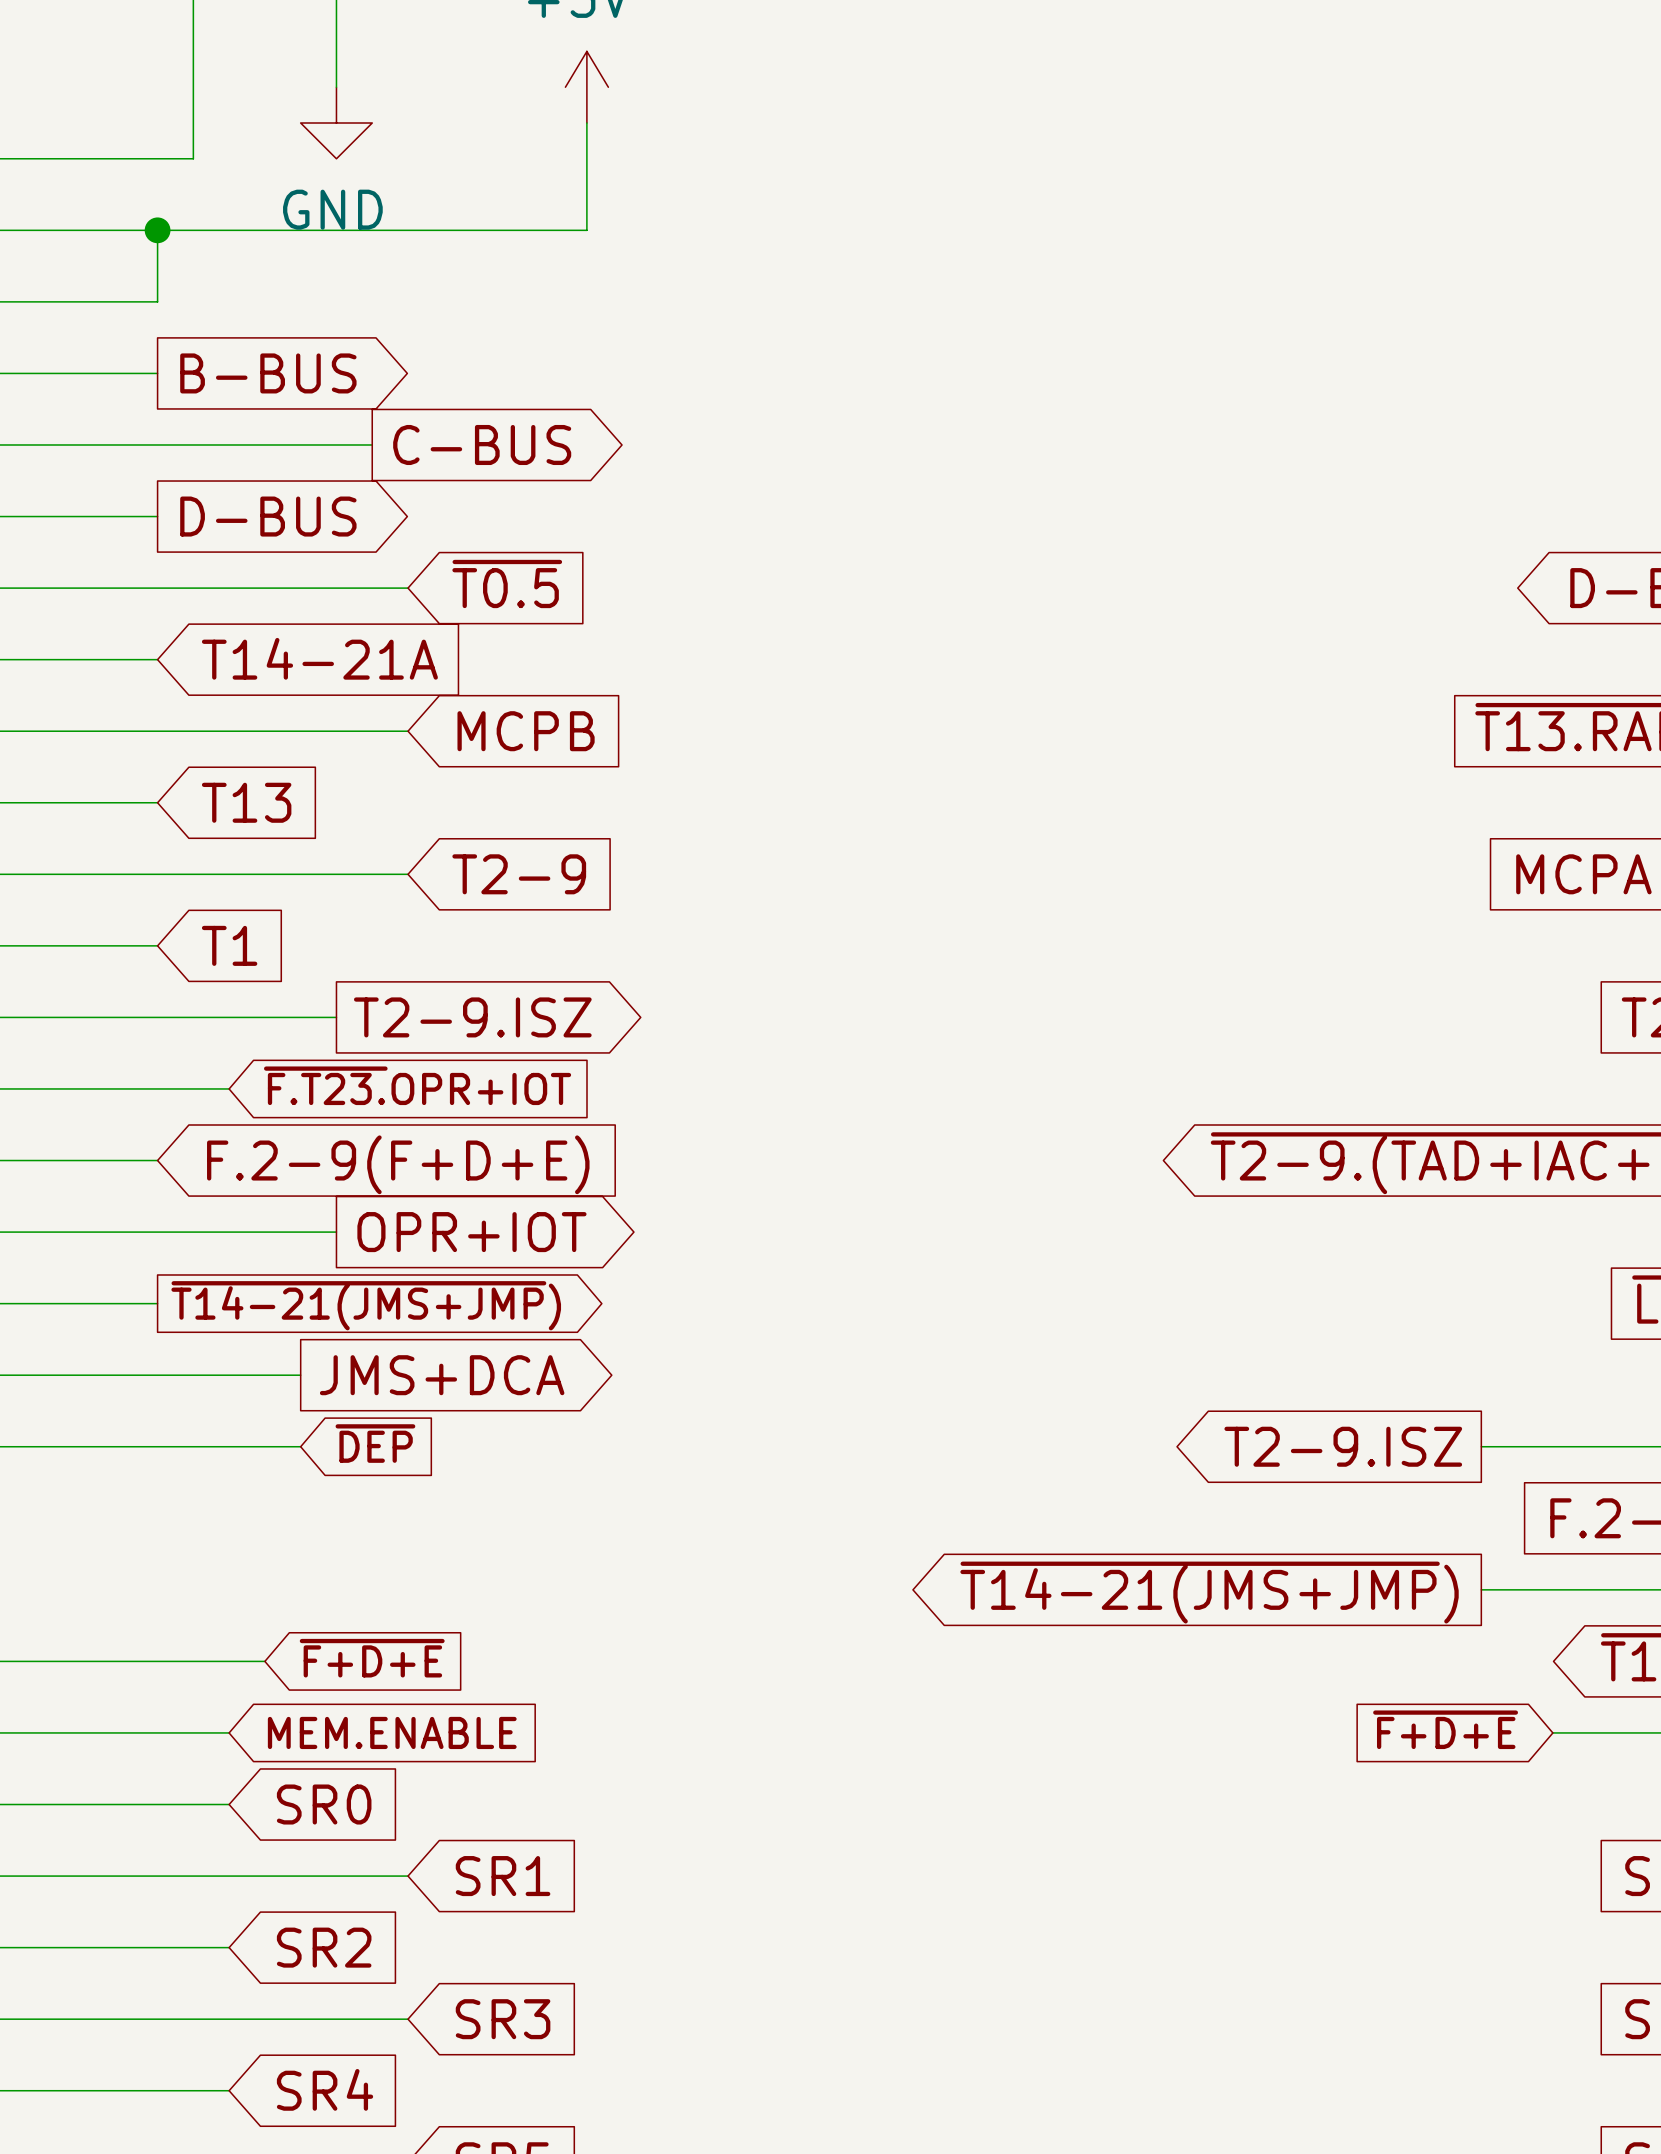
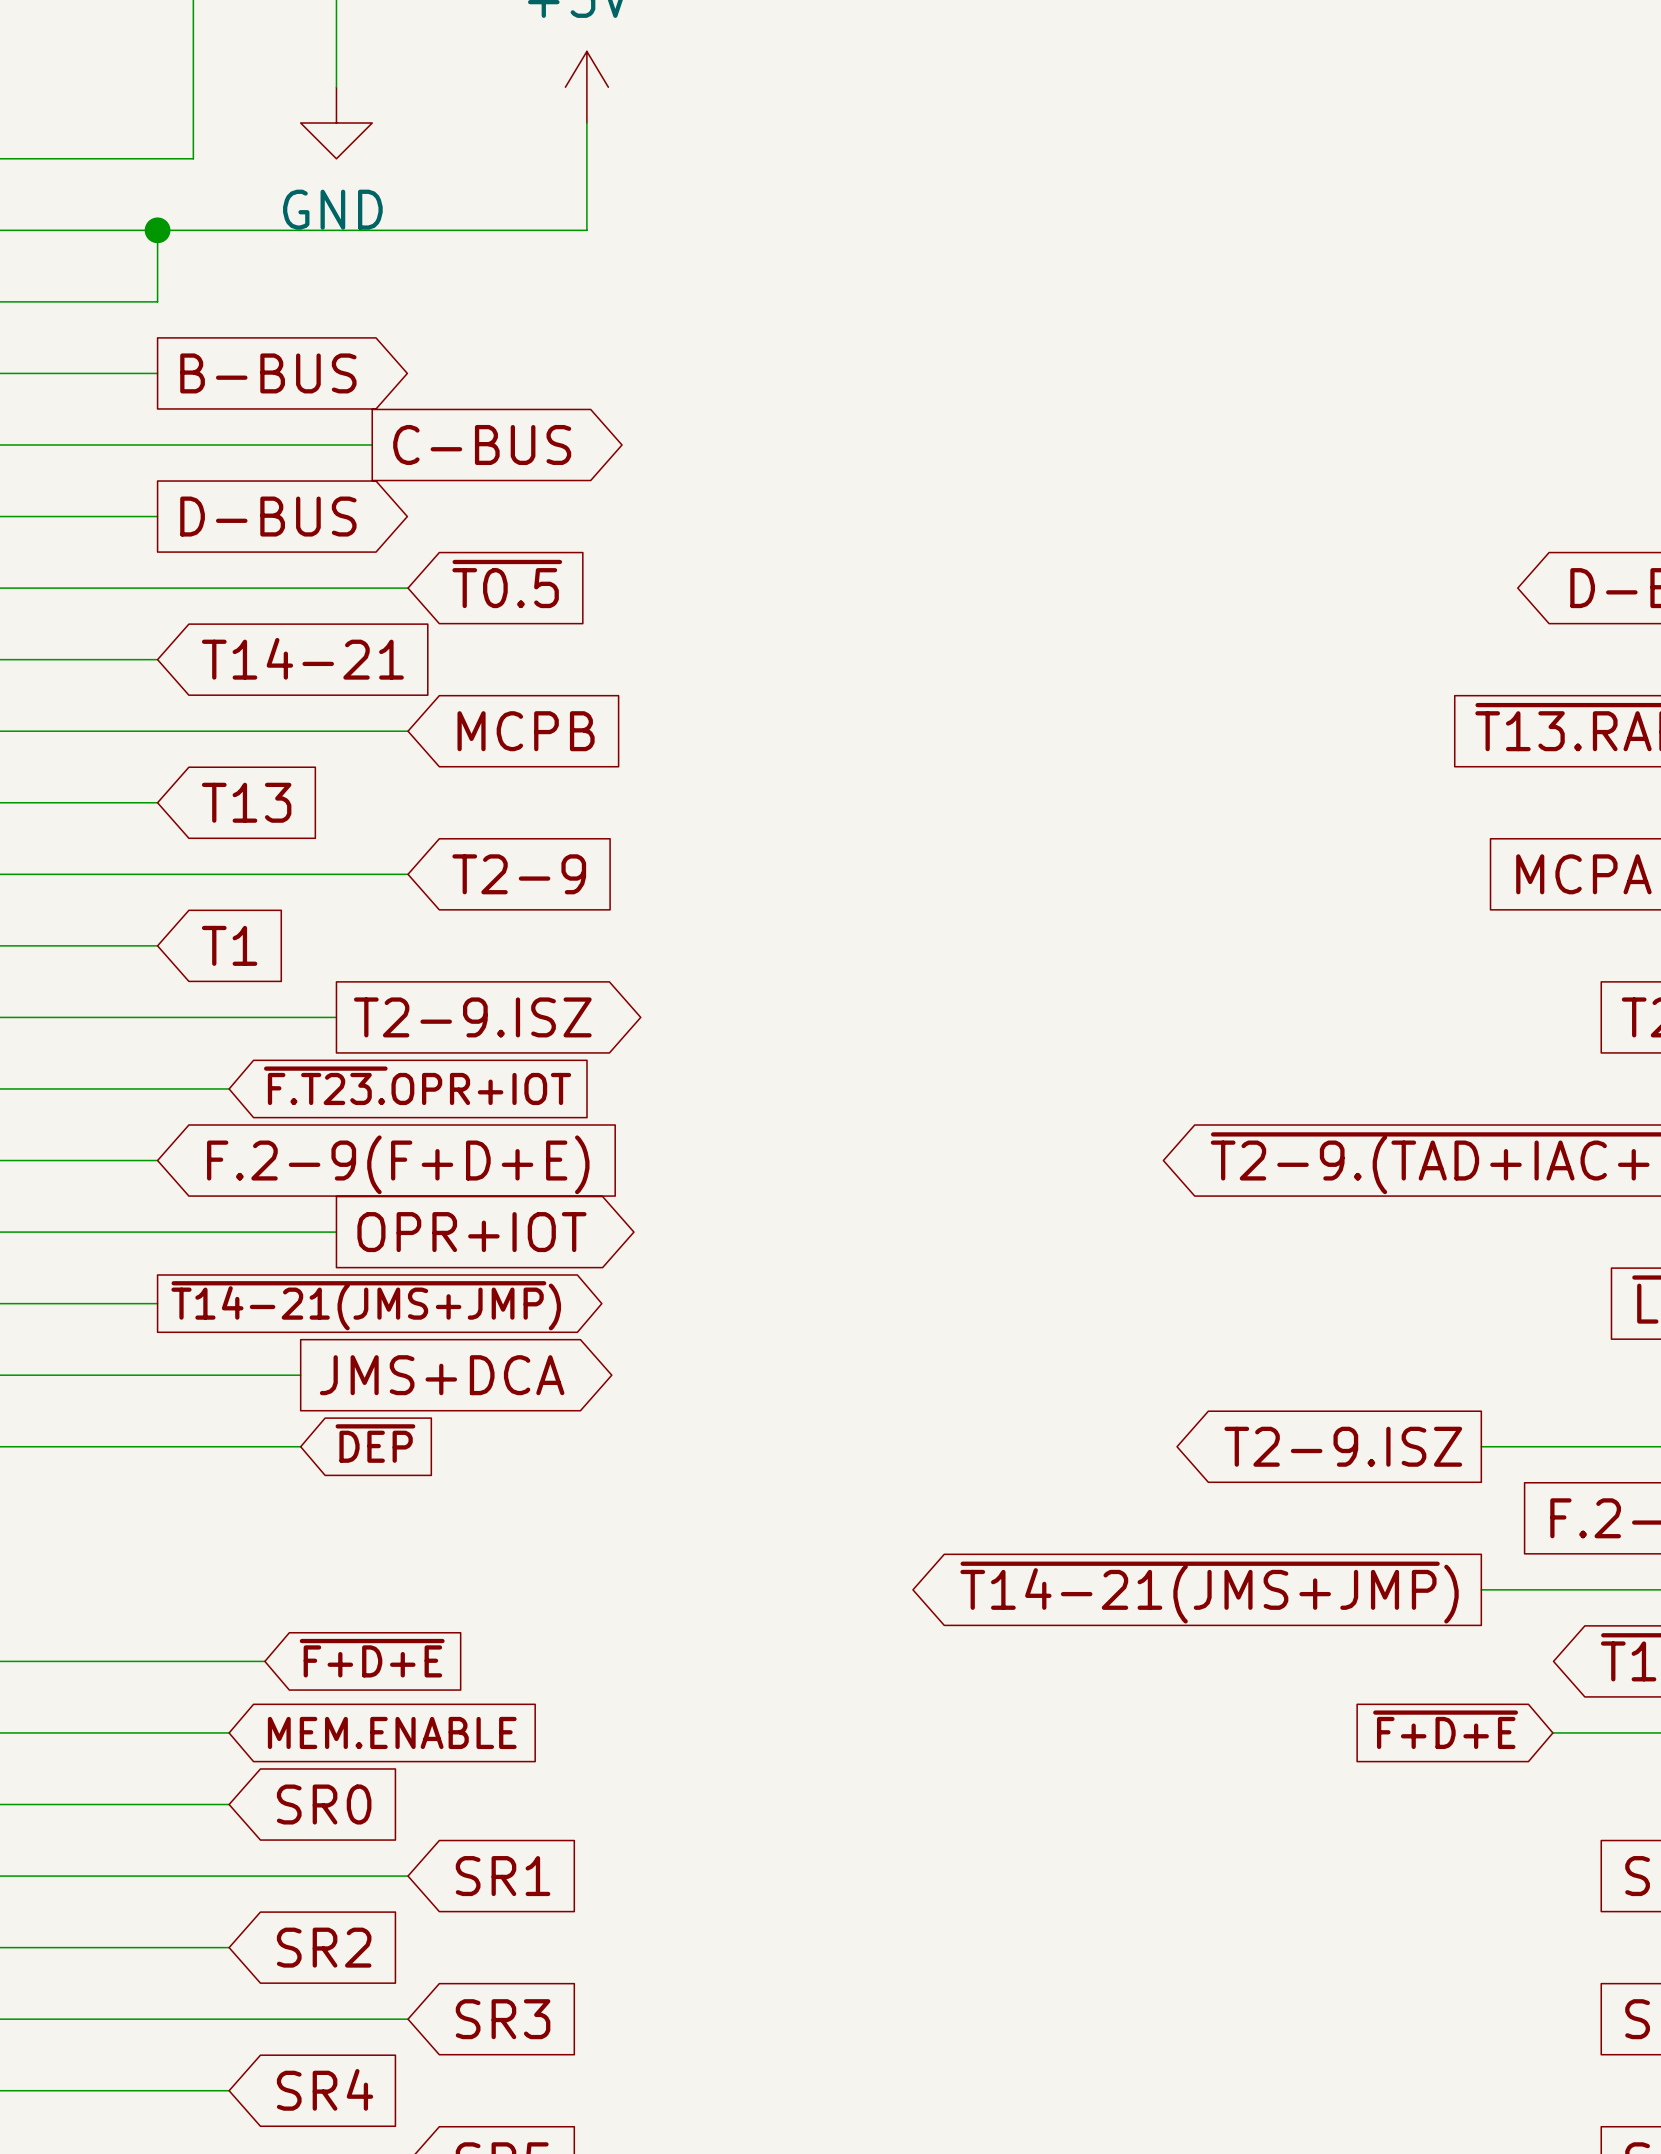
global label: T14-21A (319, 658) -> T14-21 (302, 658)

